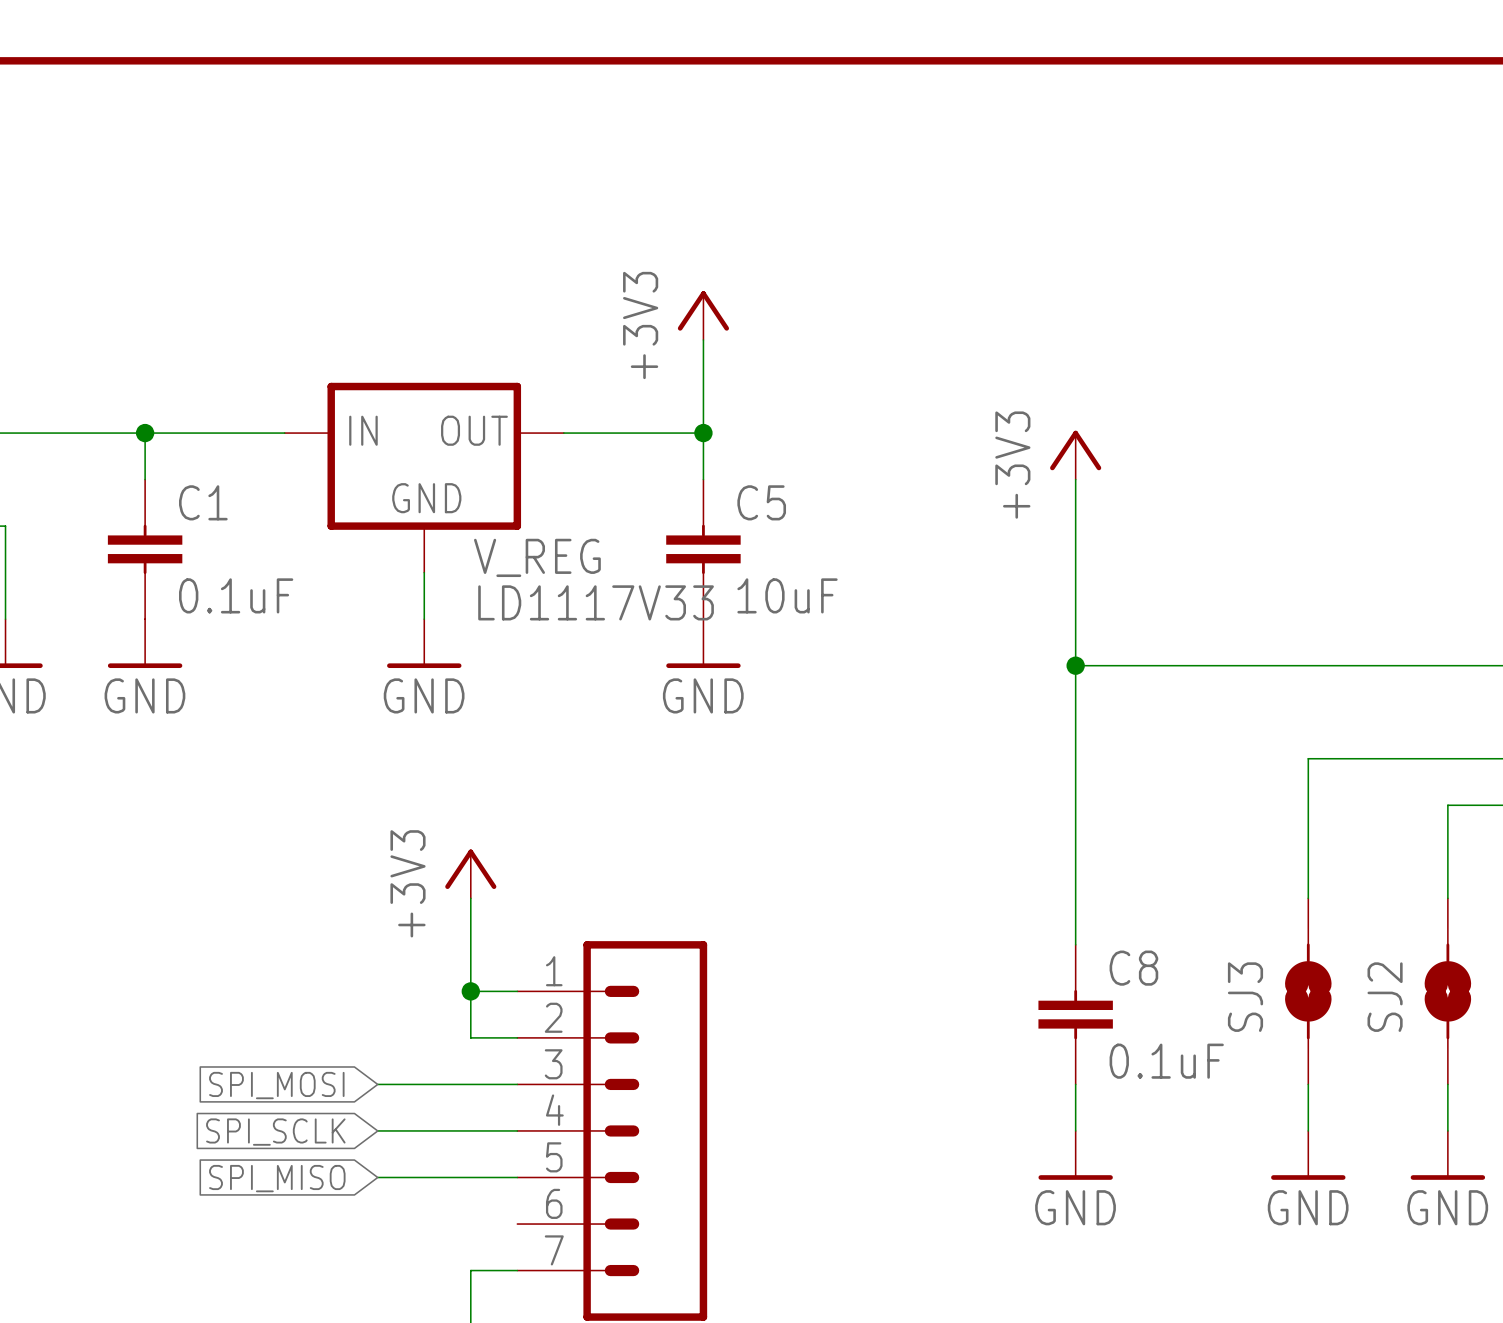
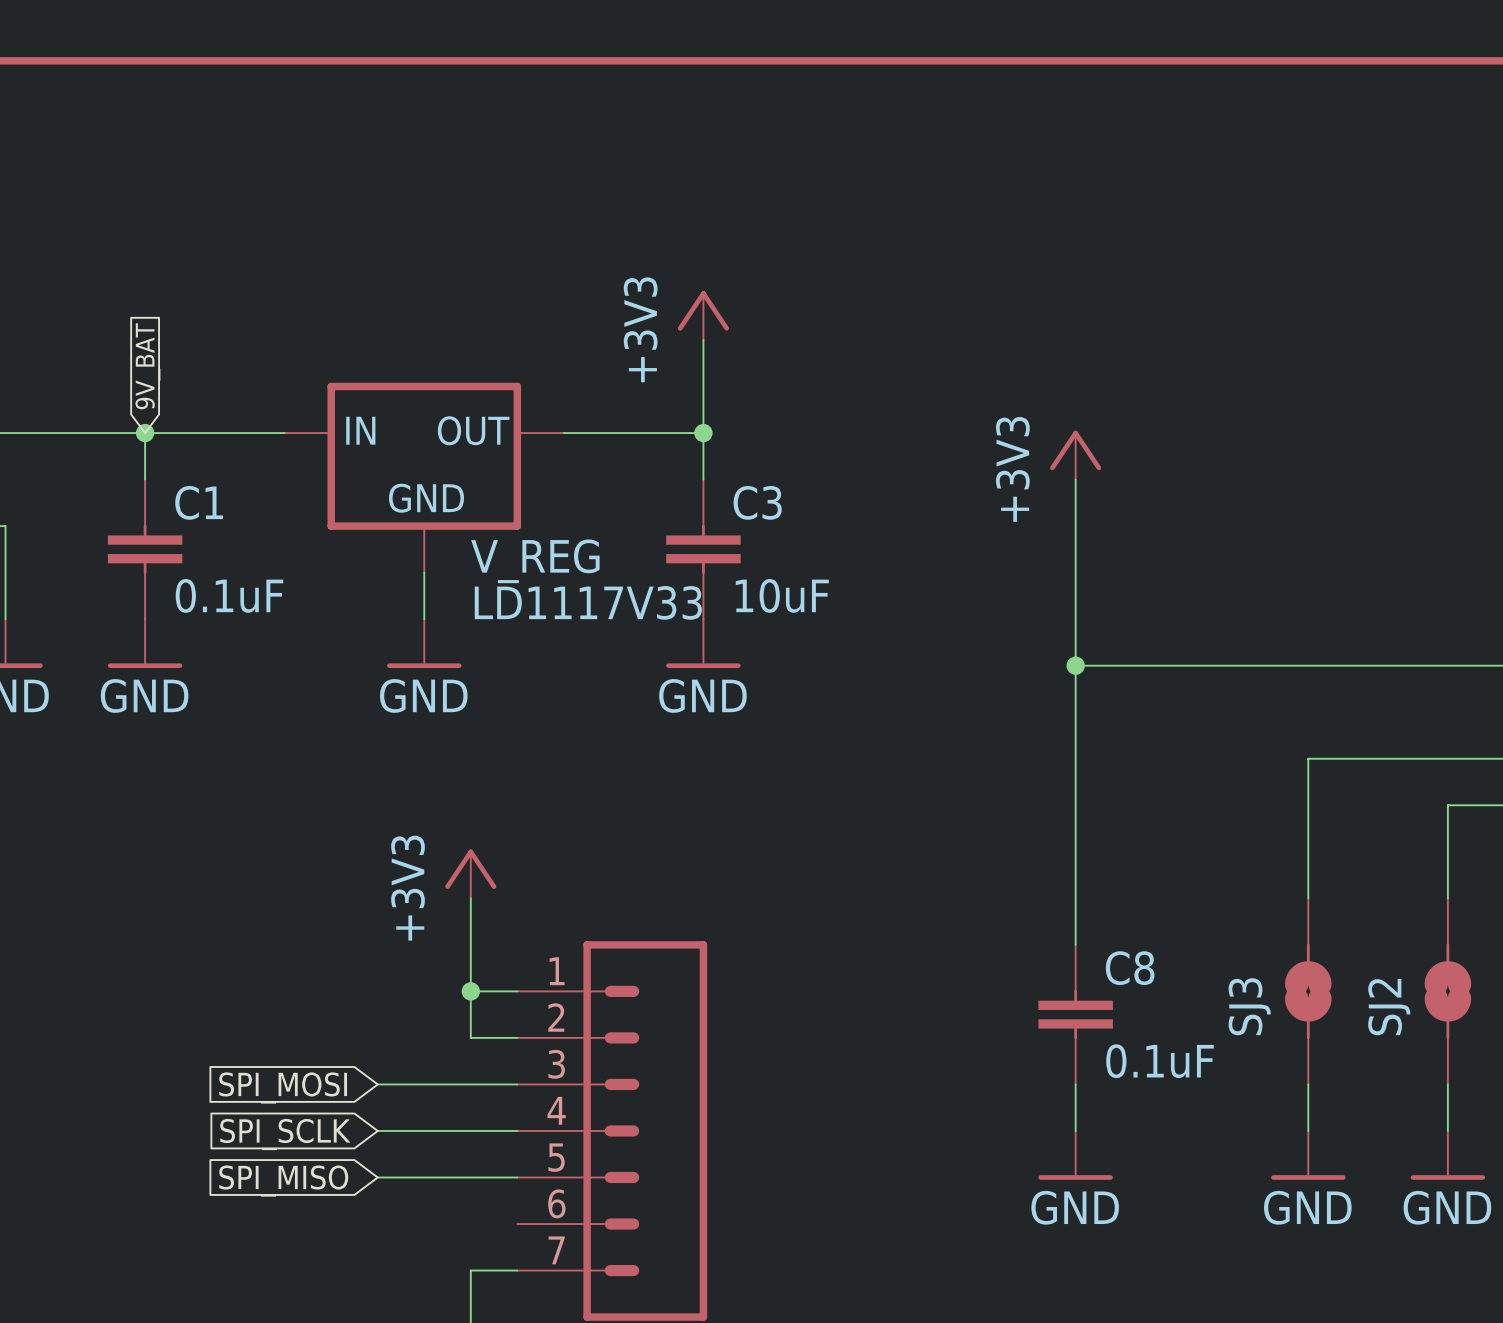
global label: none -> 9V_BAT (147, 366)
C5 name: C5 (761, 502) -> C3 (757, 502)

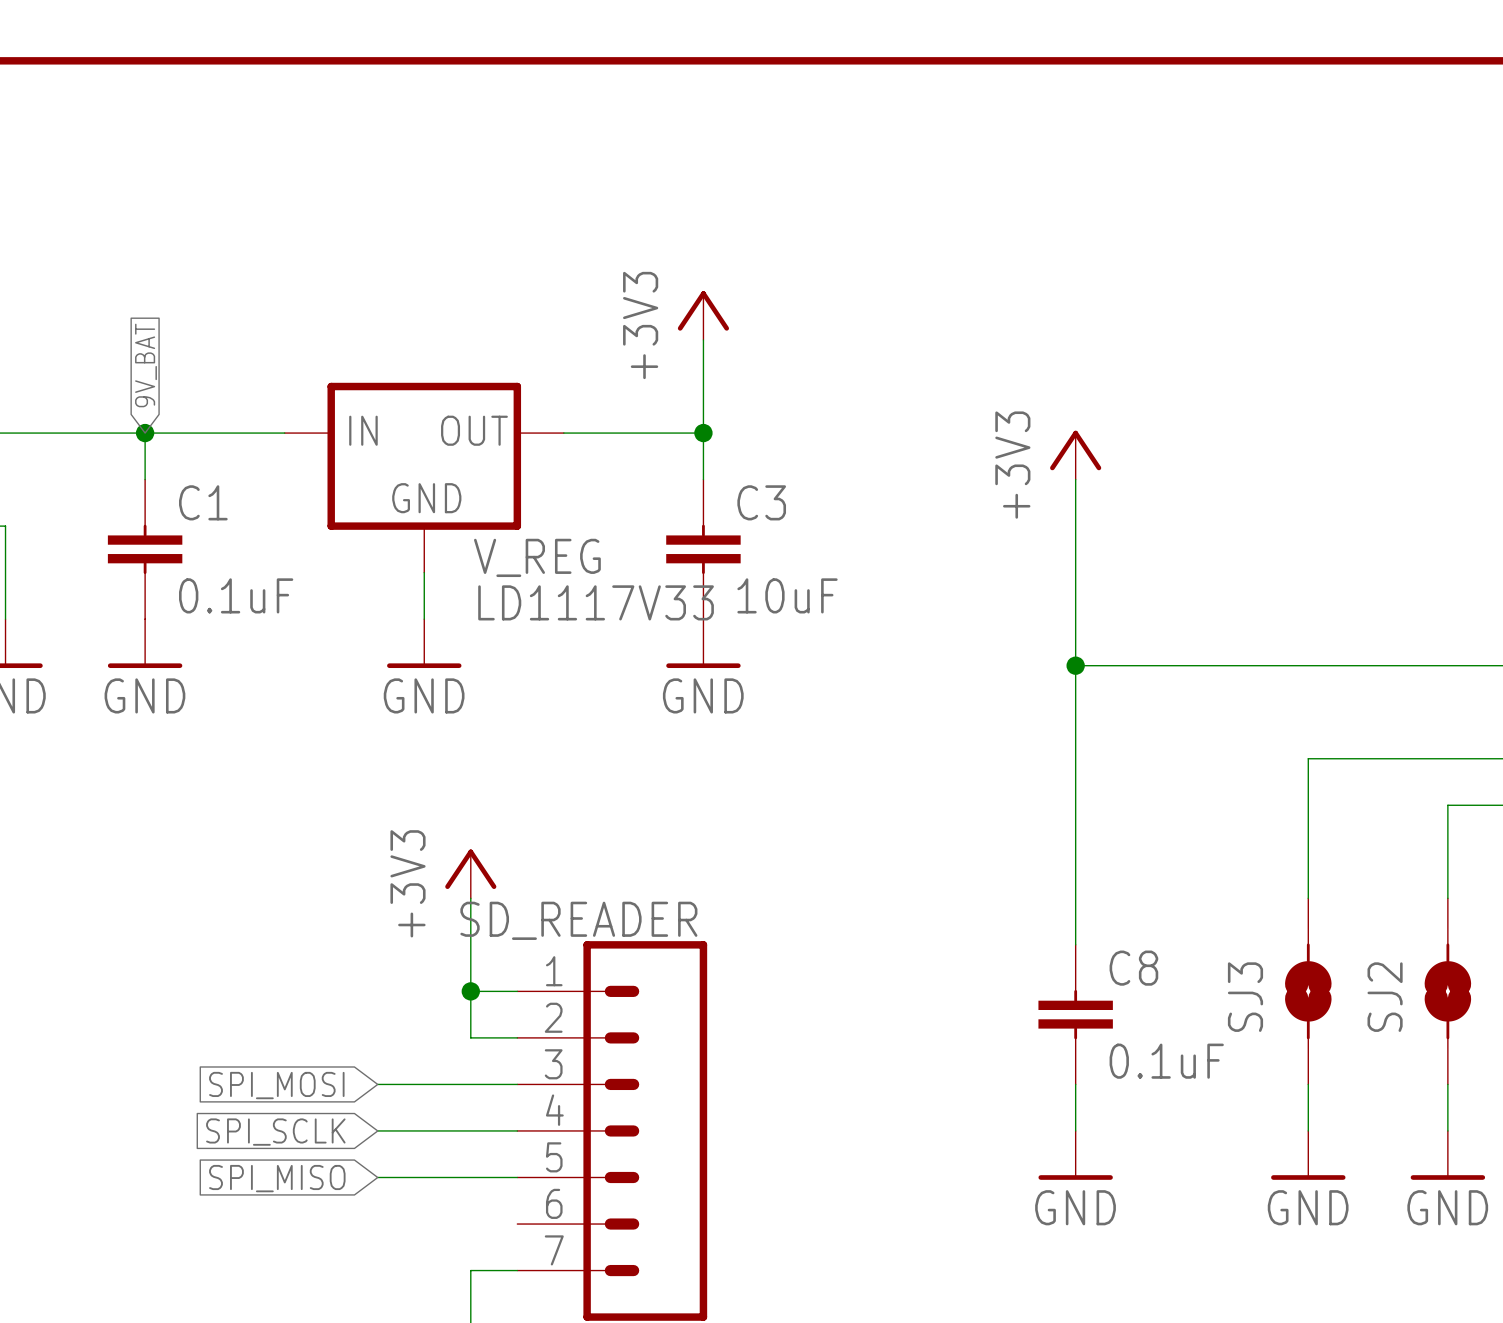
part value: none -> SD_READER (578, 920)

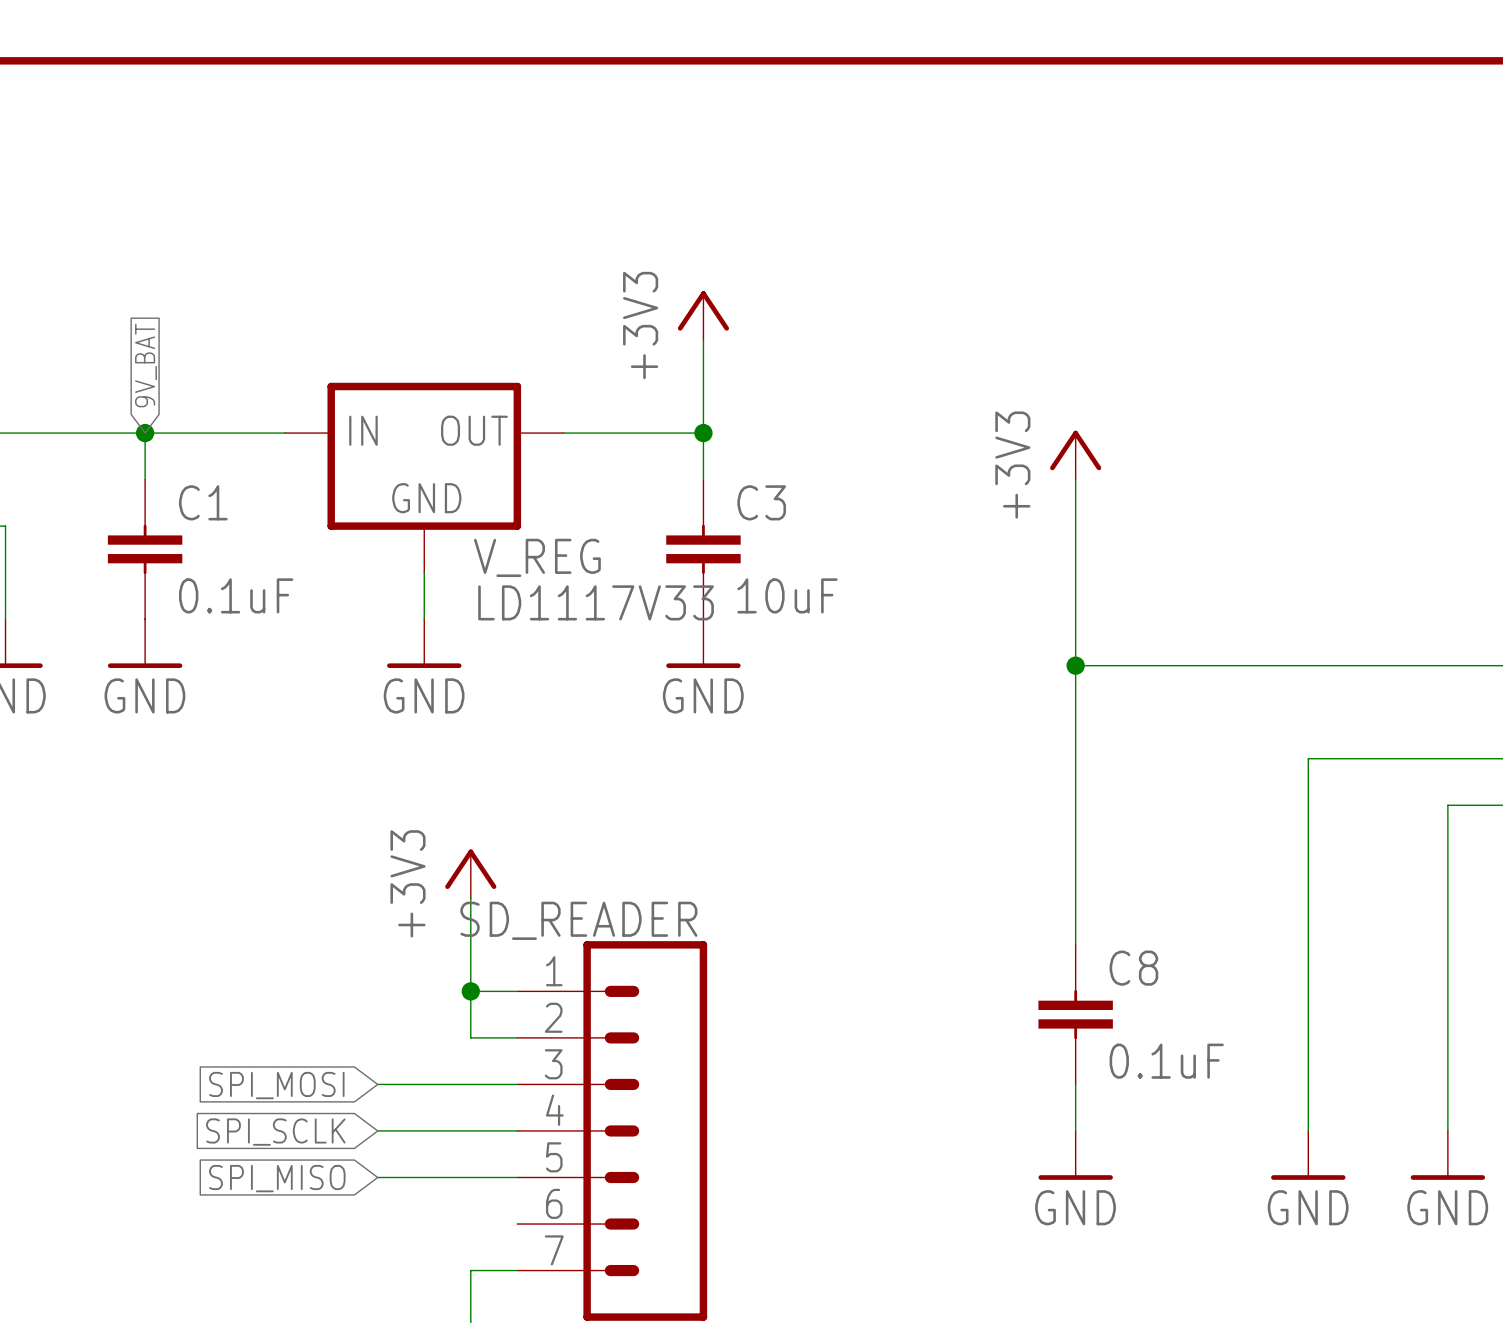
SJ3: (1308, 991) -> none
SJ2: (1447, 991) -> none

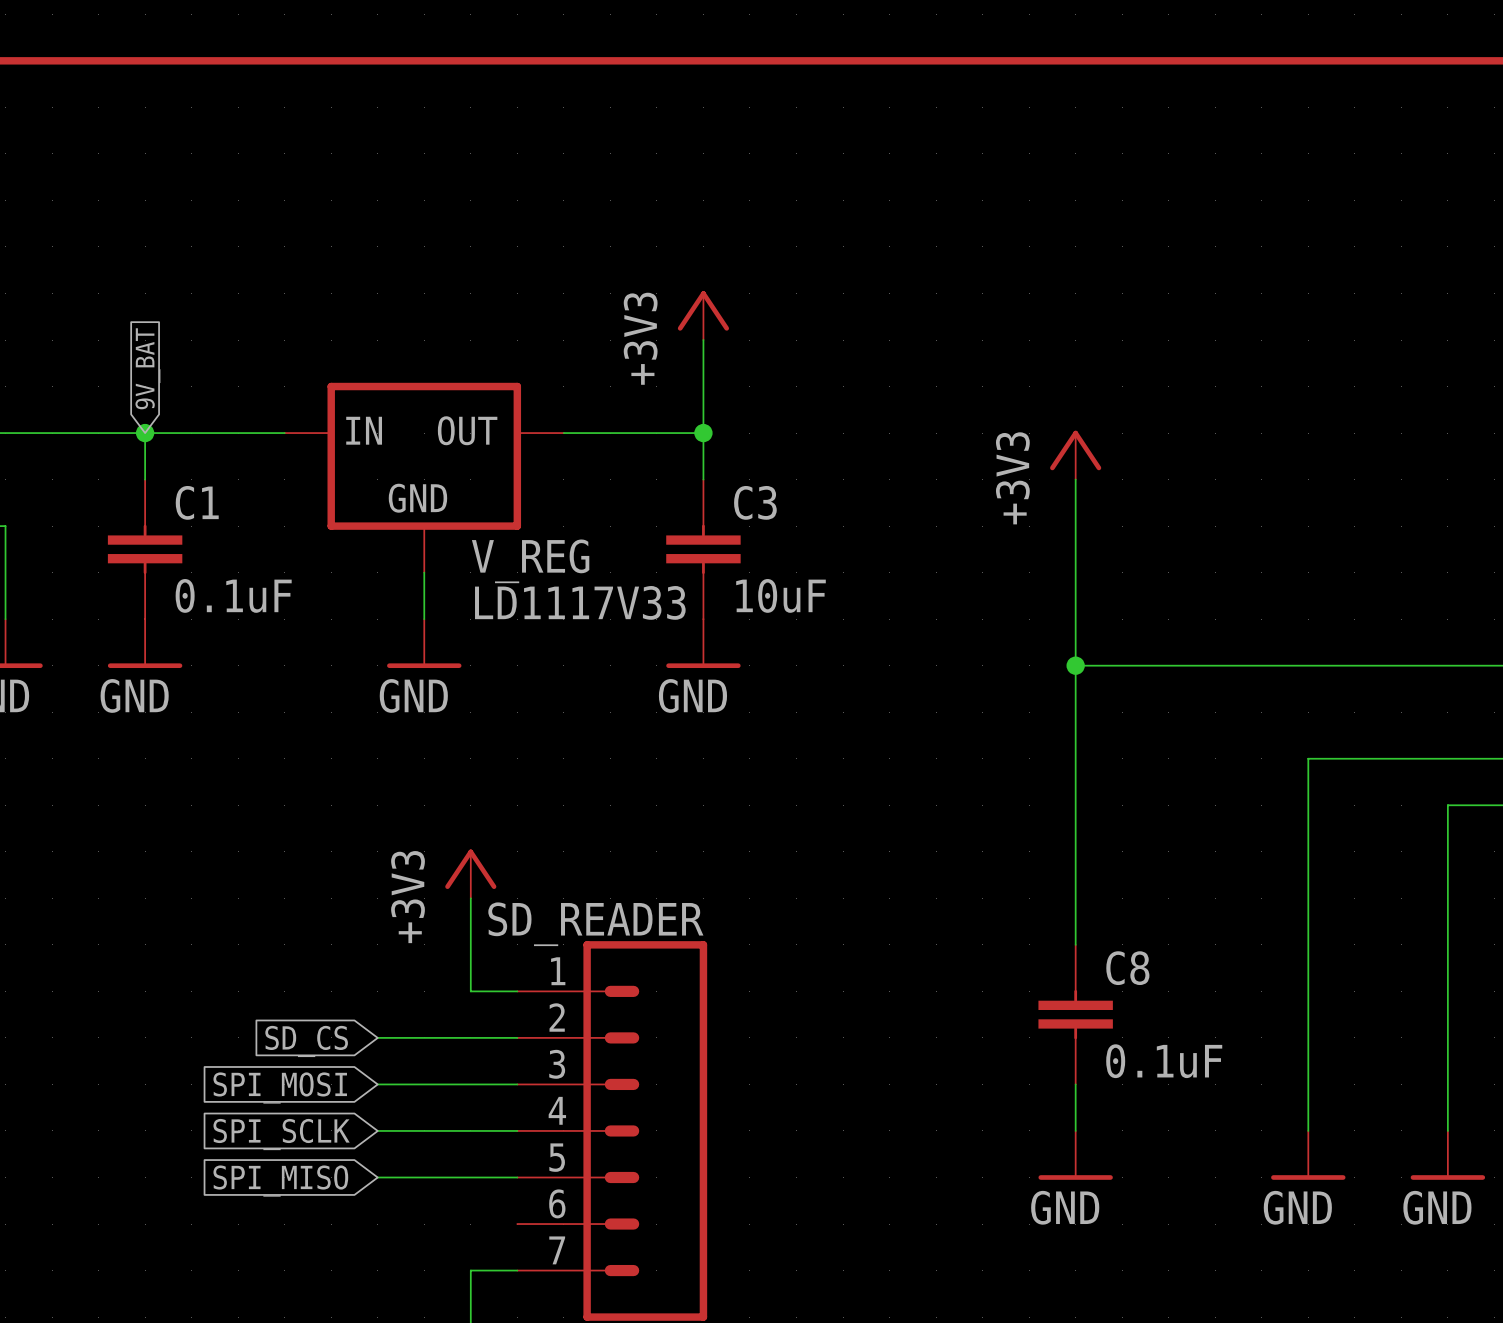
wire: (470, 991) (470, 1037) -> (377, 1037) (470, 1037)
junction: (470, 991) -> none
global label: none -> SD_CS (306, 1041)

